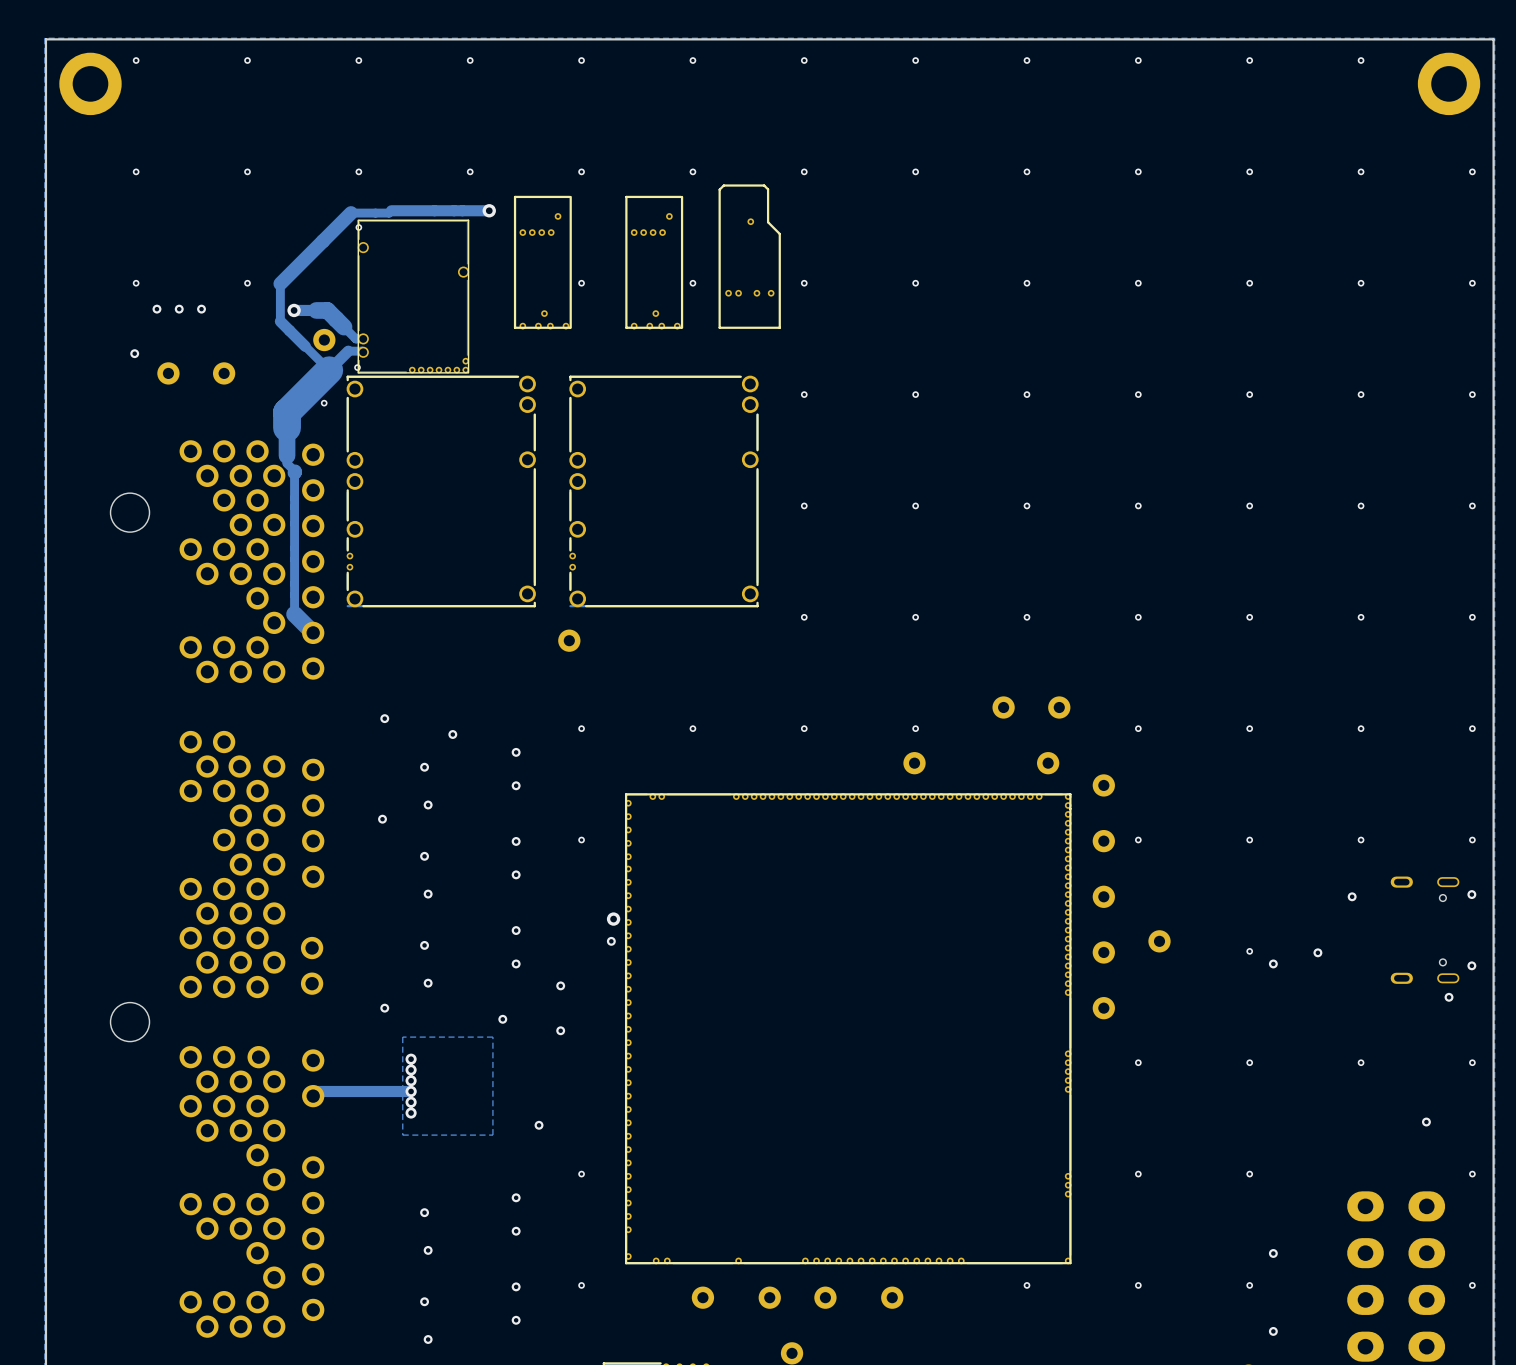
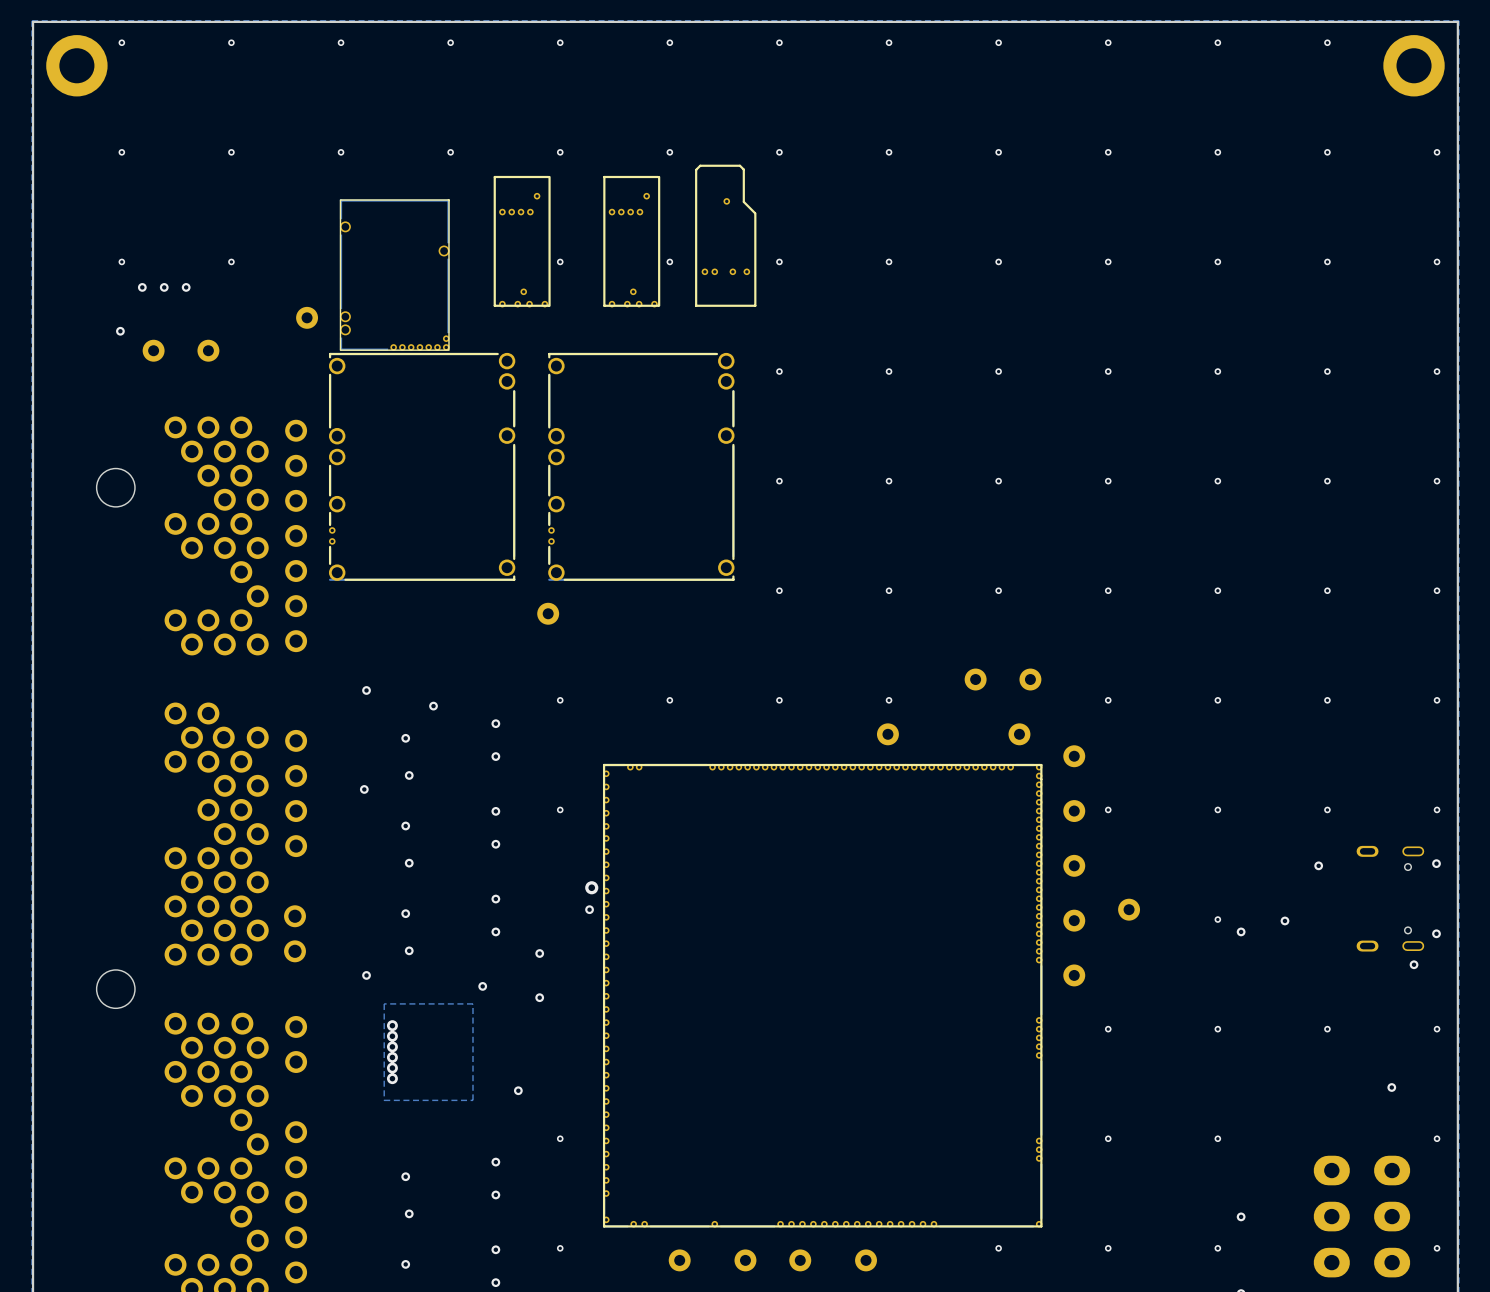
track: (489, 210) (391, 210) (389, 213) (351, 213) (280, 283) (280, 321) (329, 370) -> none
via: (489, 210) -> none
via: (358, 227) -> none
track: (294, 310) (327, 310) (355, 338) (363, 338) -> none
via: (294, 310) -> none
track: (363, 352) (348, 351) (329, 370) -> none
via: (357, 367) -> none
track: (329, 370) (287, 412) (287, 463) (294, 471) (294, 614) (313, 632) -> none
via: (324, 403) -> none
track: (411, 1091) (317, 1091) (313, 1096) -> none

